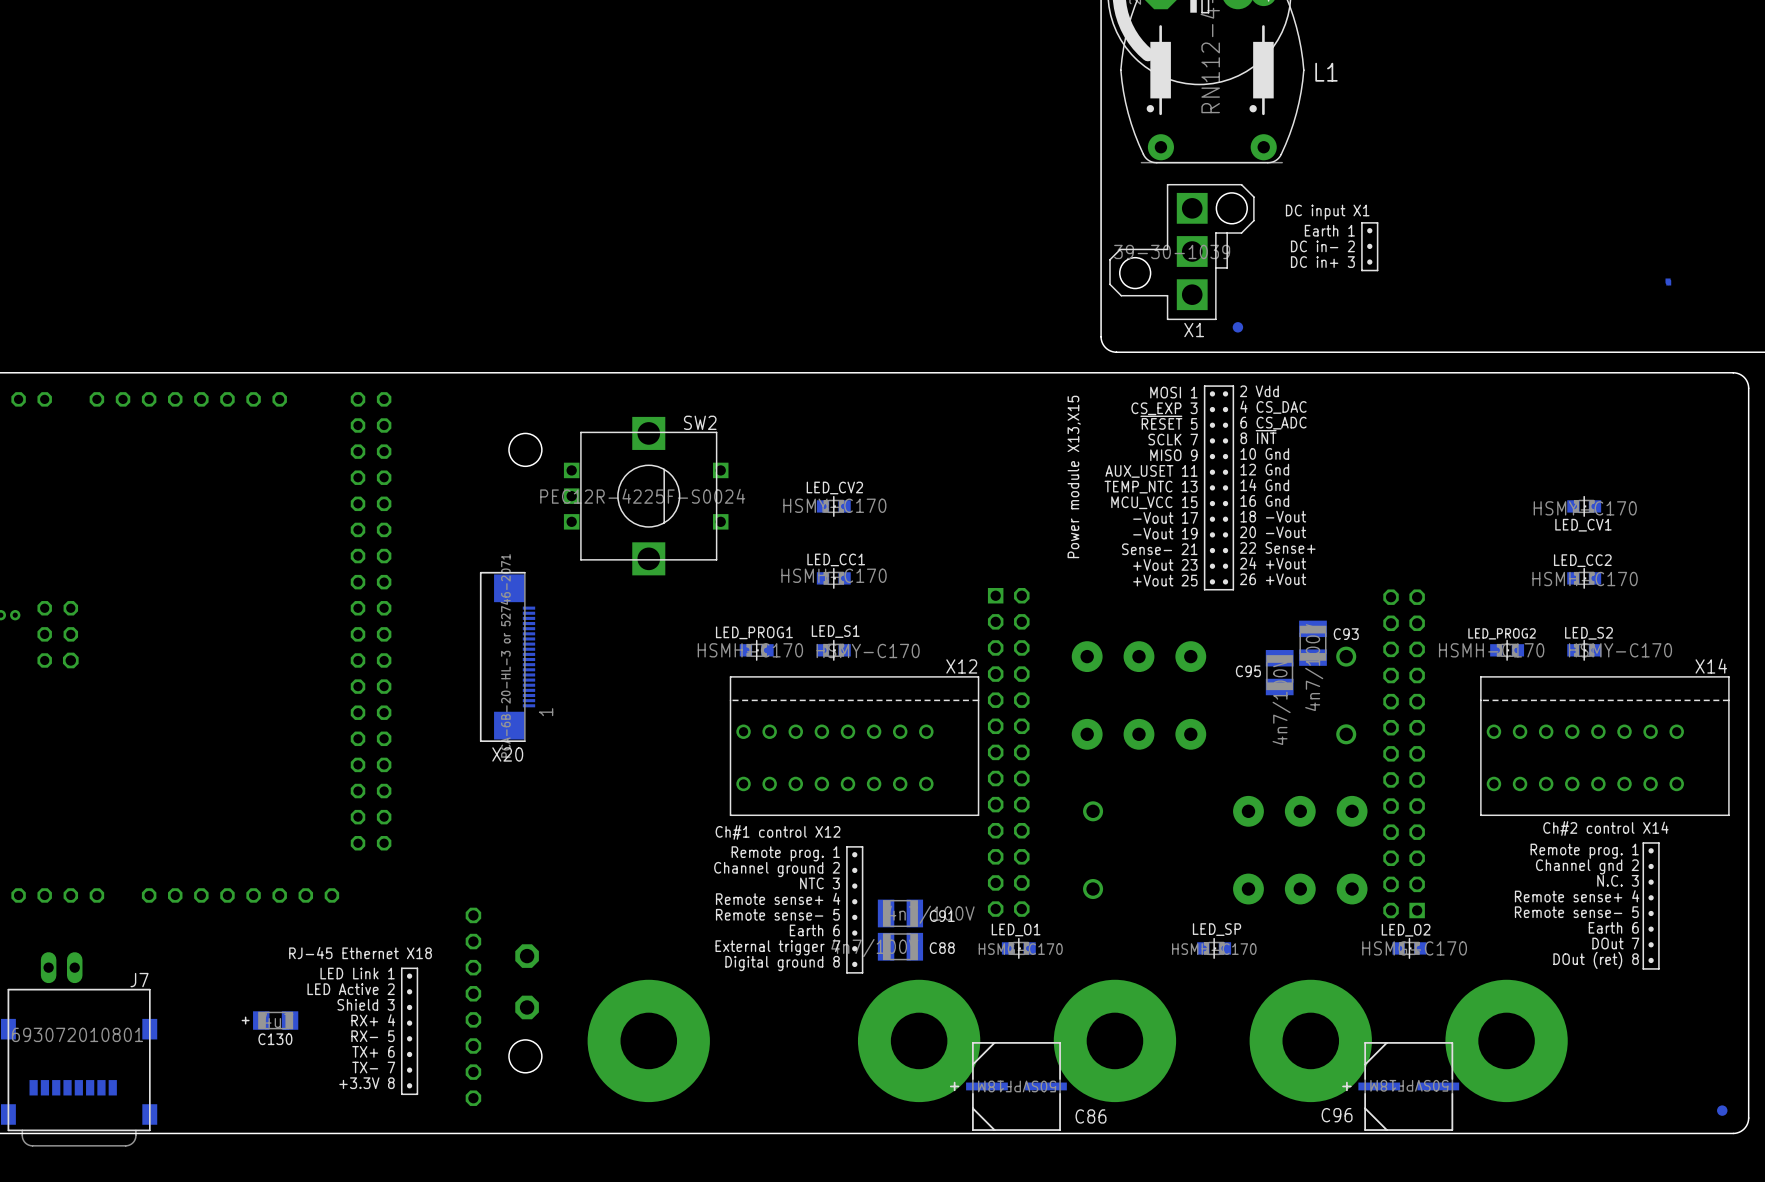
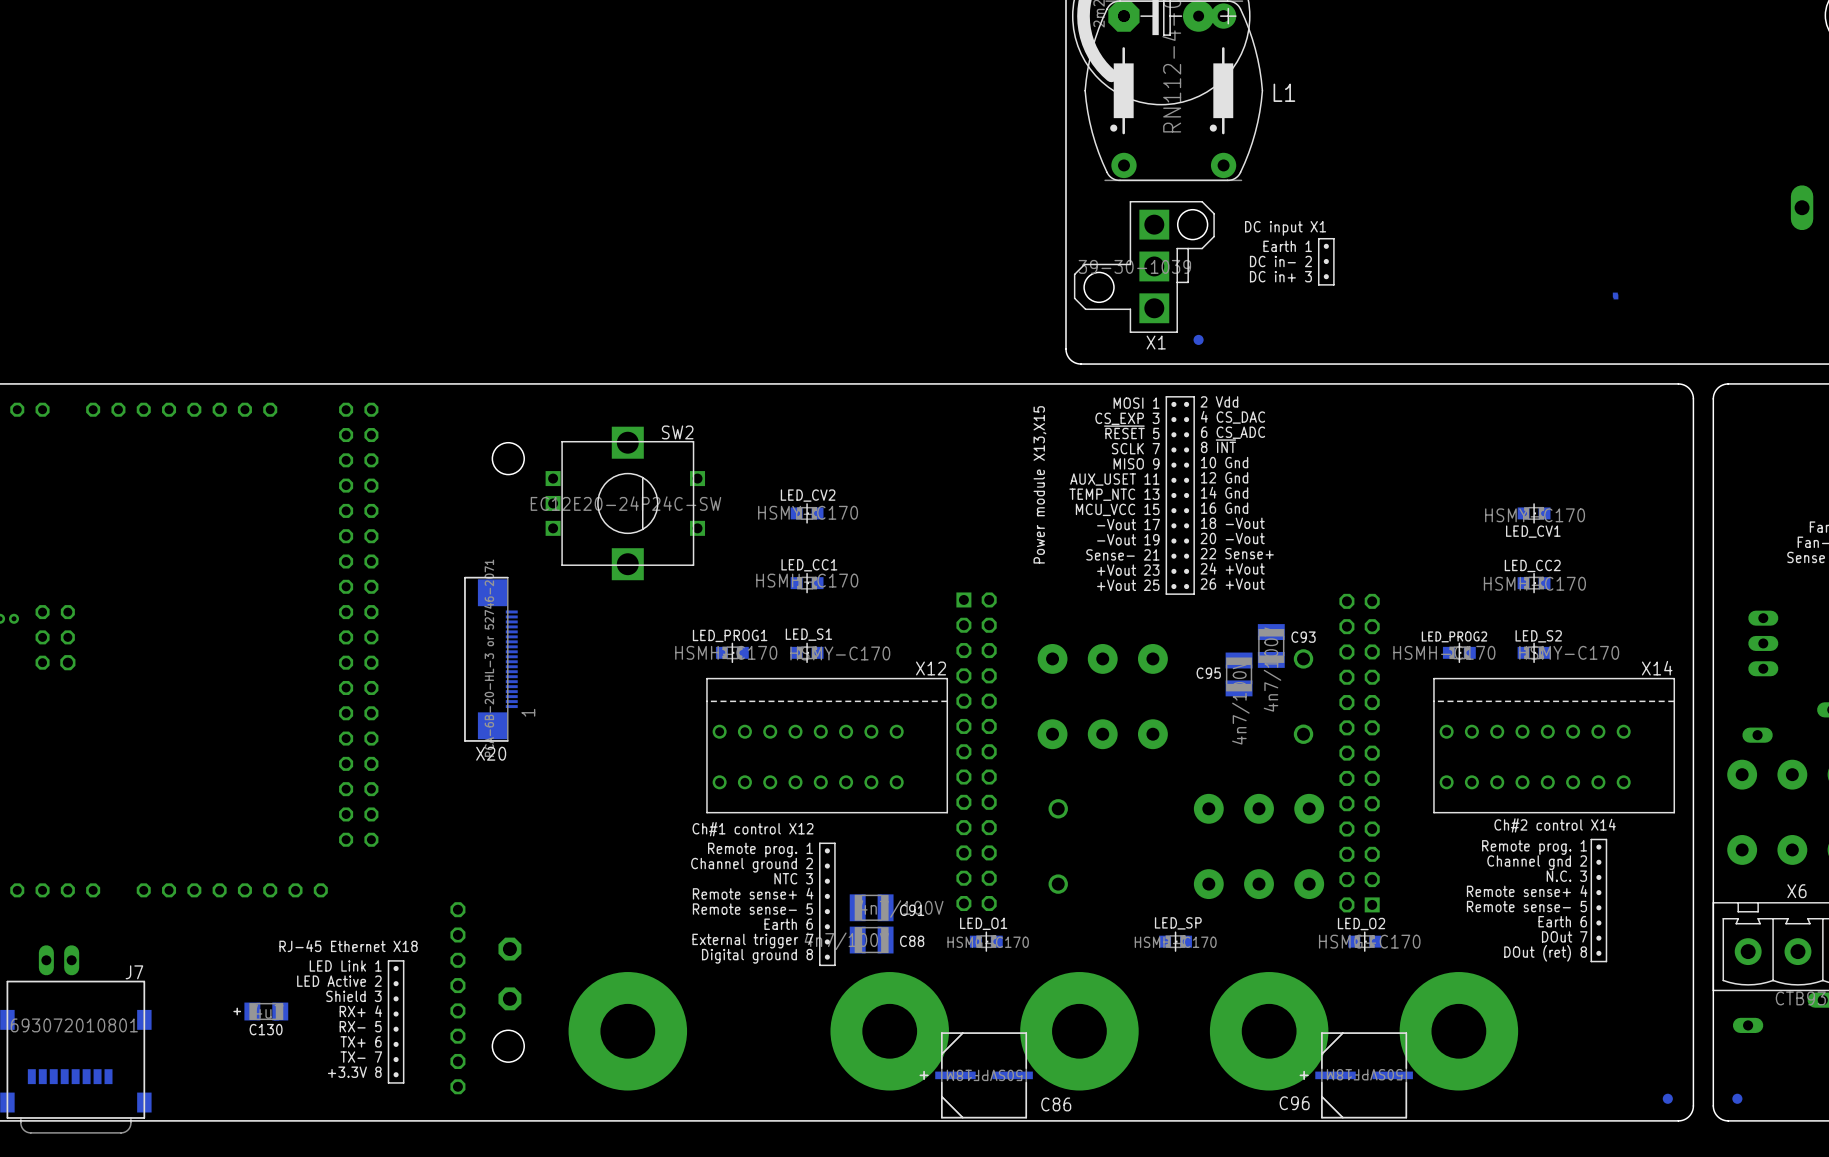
SW2 value: PEC12R-4225F-S0024 (642, 496) -> EC12E20-24P24C-SW (625, 503)

